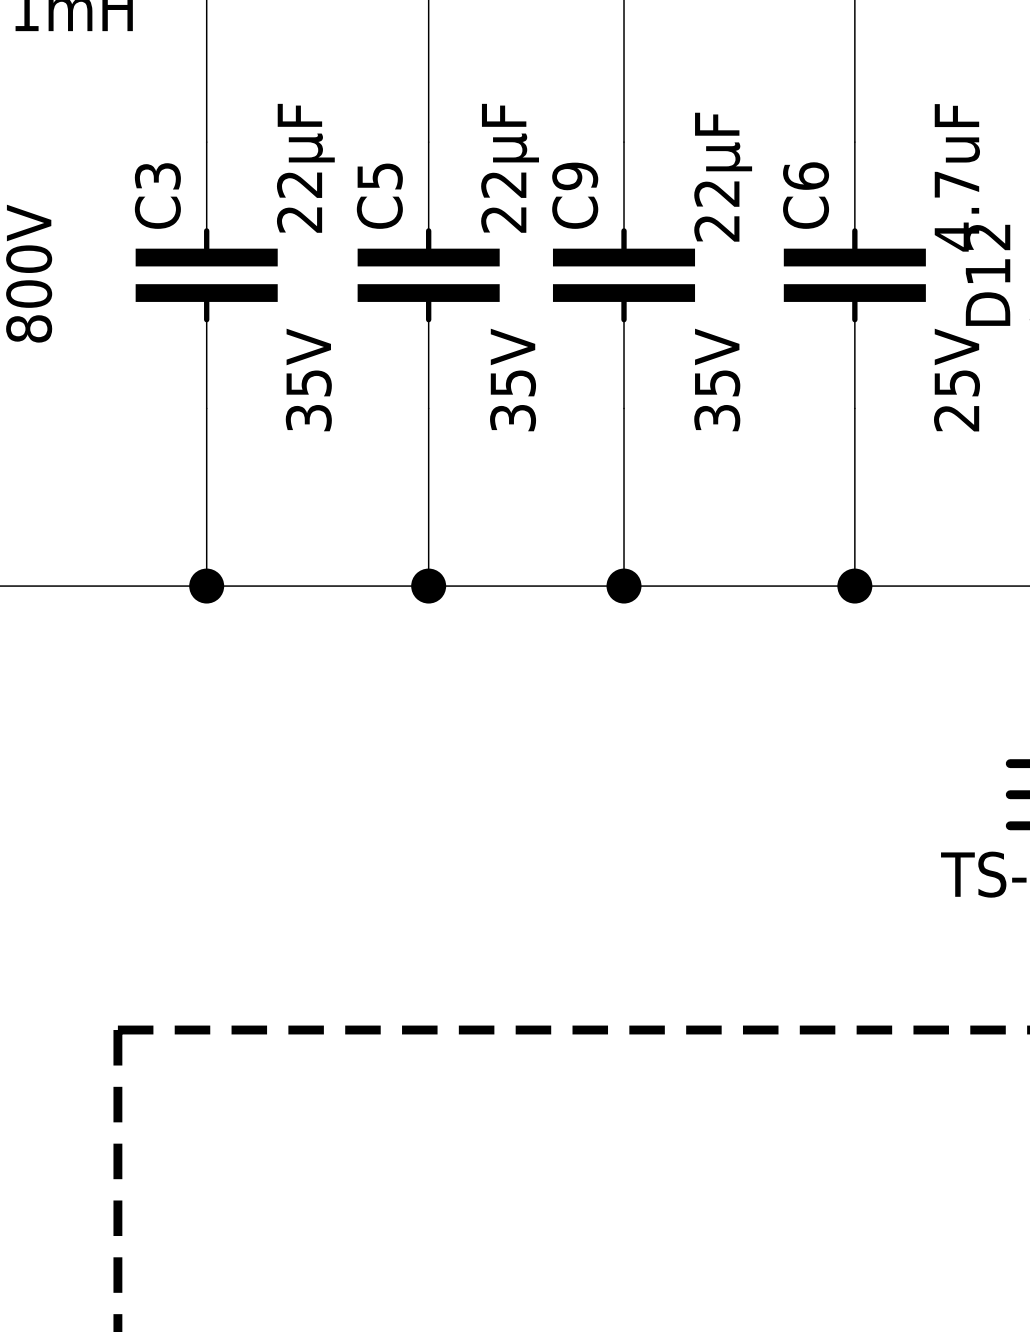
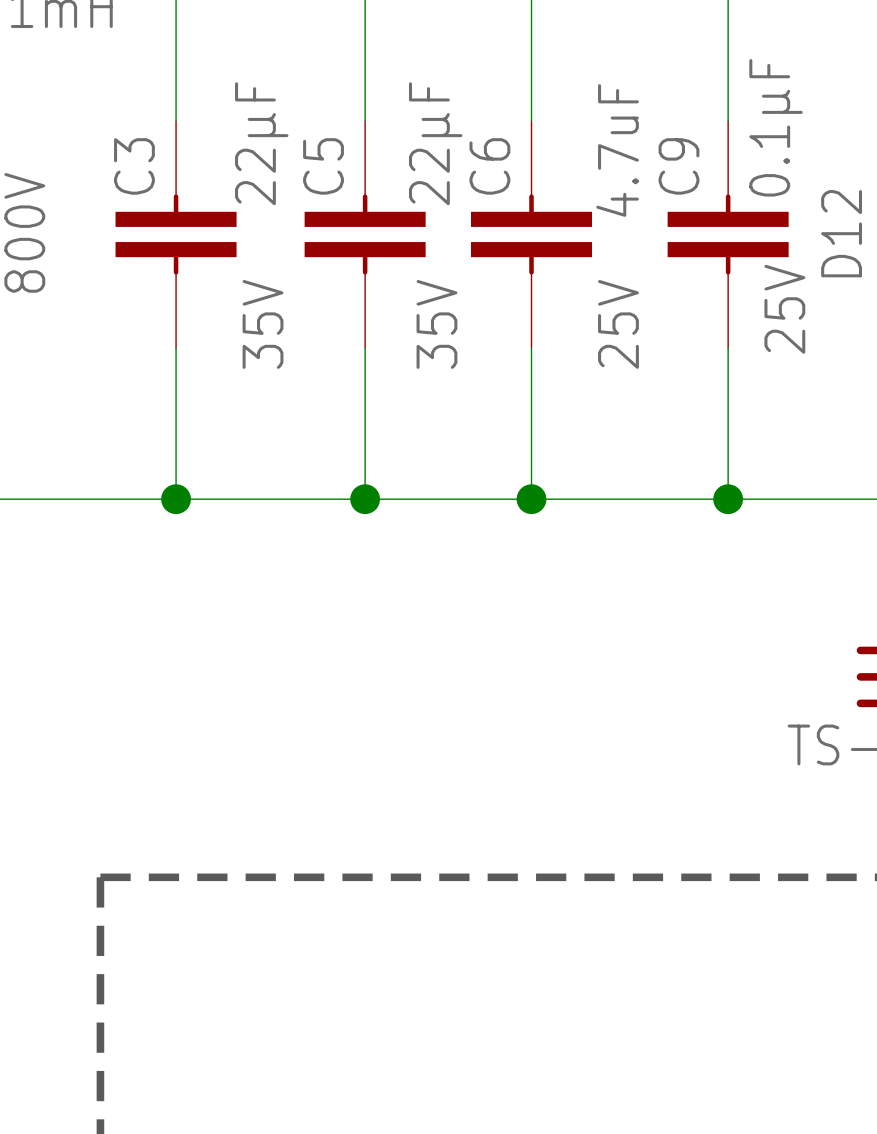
C9 text: 22µF (723, 177) -> 4.7uF (617, 150)
C6 text: 4.7uF (957, 177) -> 0.1µF (776, 127)
C9 name: C9 (575, 195) -> C6 (489, 166)
C6 name: C6 (806, 195) -> C9 (678, 166)
C9 text: 35V (717, 379) -> 25V (618, 324)
C6 text position: 25V (957, 380) -> 25V (784, 309)

